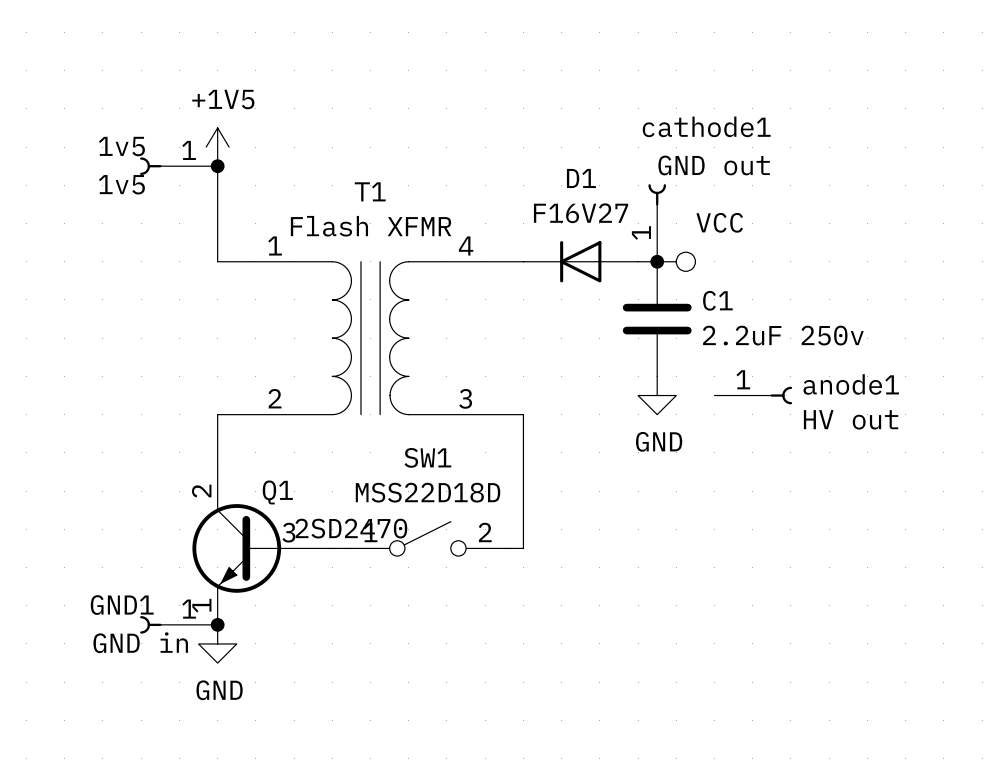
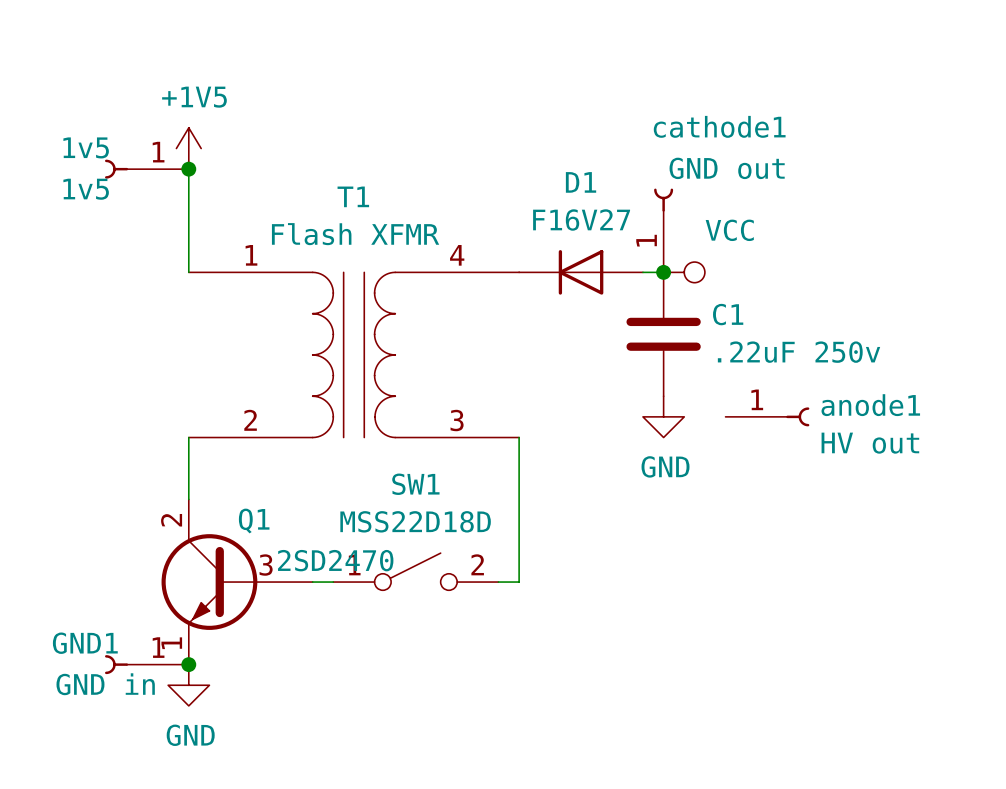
C1 value: 2.2uF 250v (783, 335) -> .22uF 250v (799, 352)

